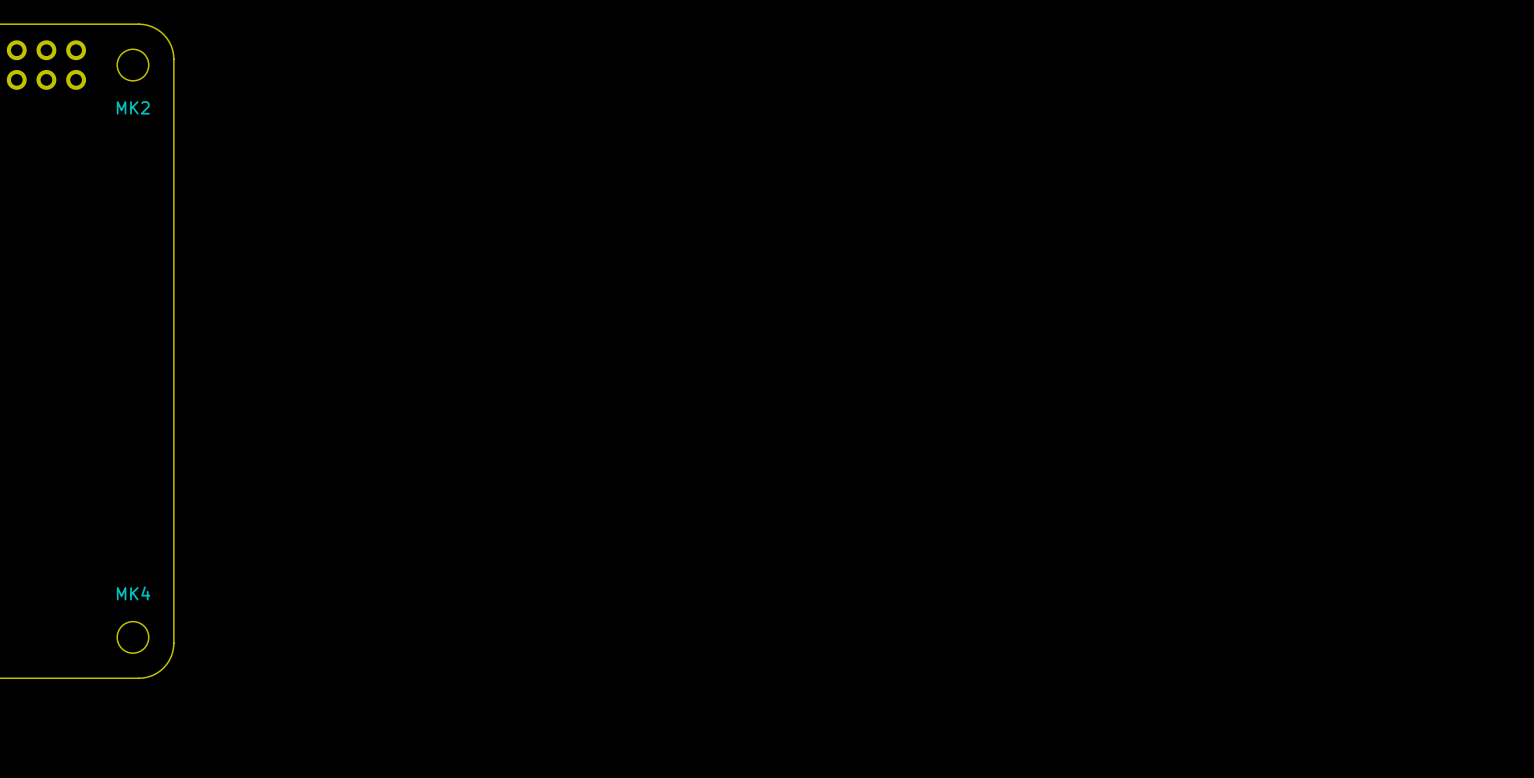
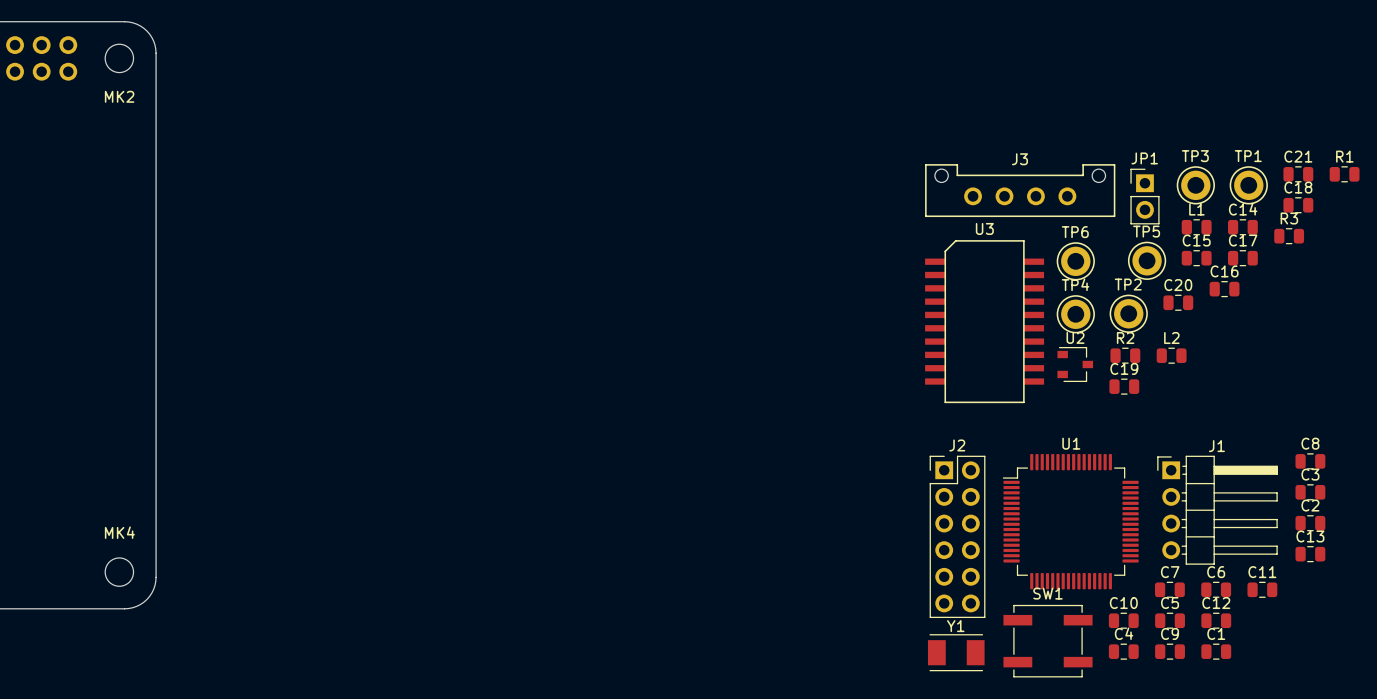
C21: none -> (1298, 174)
R1: none -> (1344, 174)
TP3: none -> (1195, 185)
TP1: none -> (1248, 185)
J3: none -> (1020, 190)
JP1: none -> (1144, 196)
C18: none -> (1298, 205)
L1: none -> (1196, 227)
C14: none -> (1242, 227)
R3: none -> (1289, 236)
C15: none -> (1196, 258)
C17: none -> (1242, 258)
TP5: none -> (1147, 260)
TP6: none -> (1075, 261)
C16: none -> (1224, 289)
C20: none -> (1178, 302)
TP2: none -> (1128, 313)
TP4: none -> (1075, 314)
U3: none -> (984, 321)
R2: none -> (1125, 355)
L2: none -> (1171, 355)
U2: none -> (1075, 364)
C19: none -> (1124, 386)
C8: none -> (1310, 461)
C3: none -> (1310, 492)
J1: none -> (1217, 510)
U1: none -> (1070, 521)
C2: none -> (1310, 523)
J2: none -> (957, 536)
C13: none -> (1310, 554)
C7: none -> (1169, 589)
C6: none -> (1216, 589)
C11: none -> (1262, 589)
C10: none -> (1123, 620)
C5: none -> (1170, 620)
C12: none -> (1216, 620)
SW1: none -> (1048, 641)
C4: none -> (1123, 651)
C9: none -> (1170, 651)
C1: none -> (1216, 651)
Y1: none -> (956, 652)

